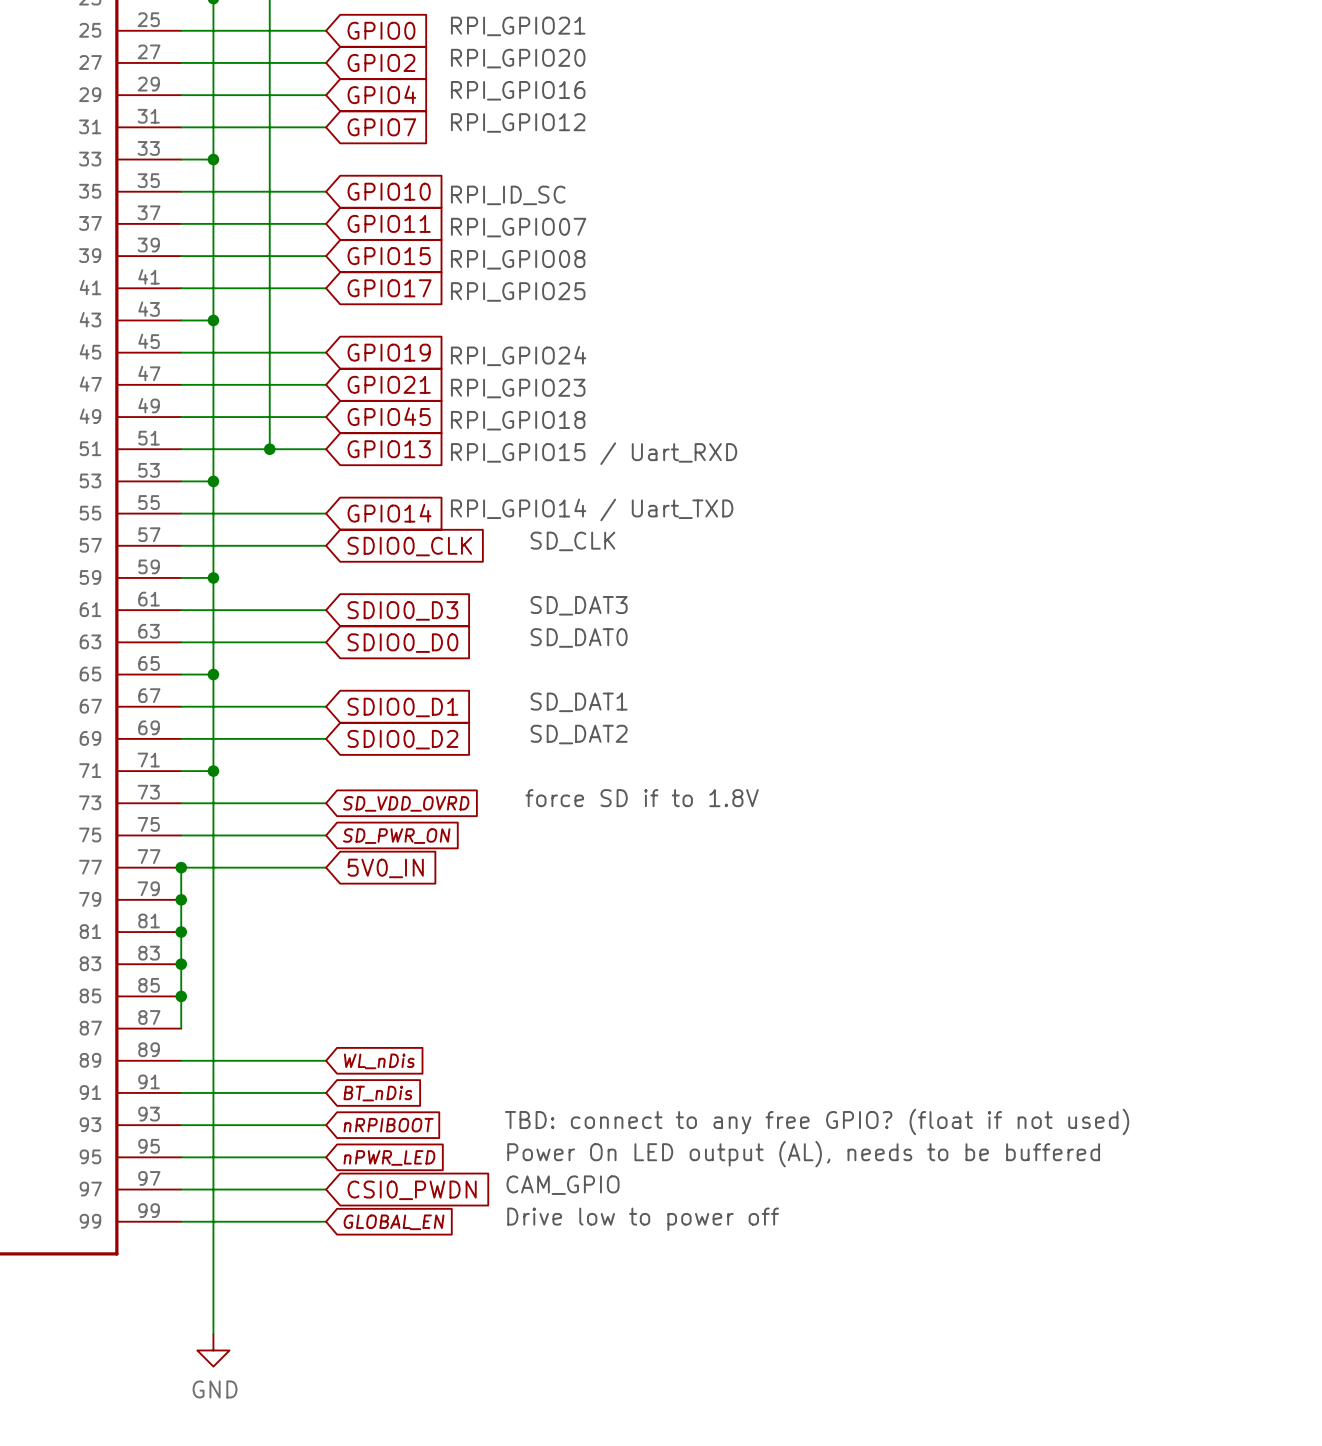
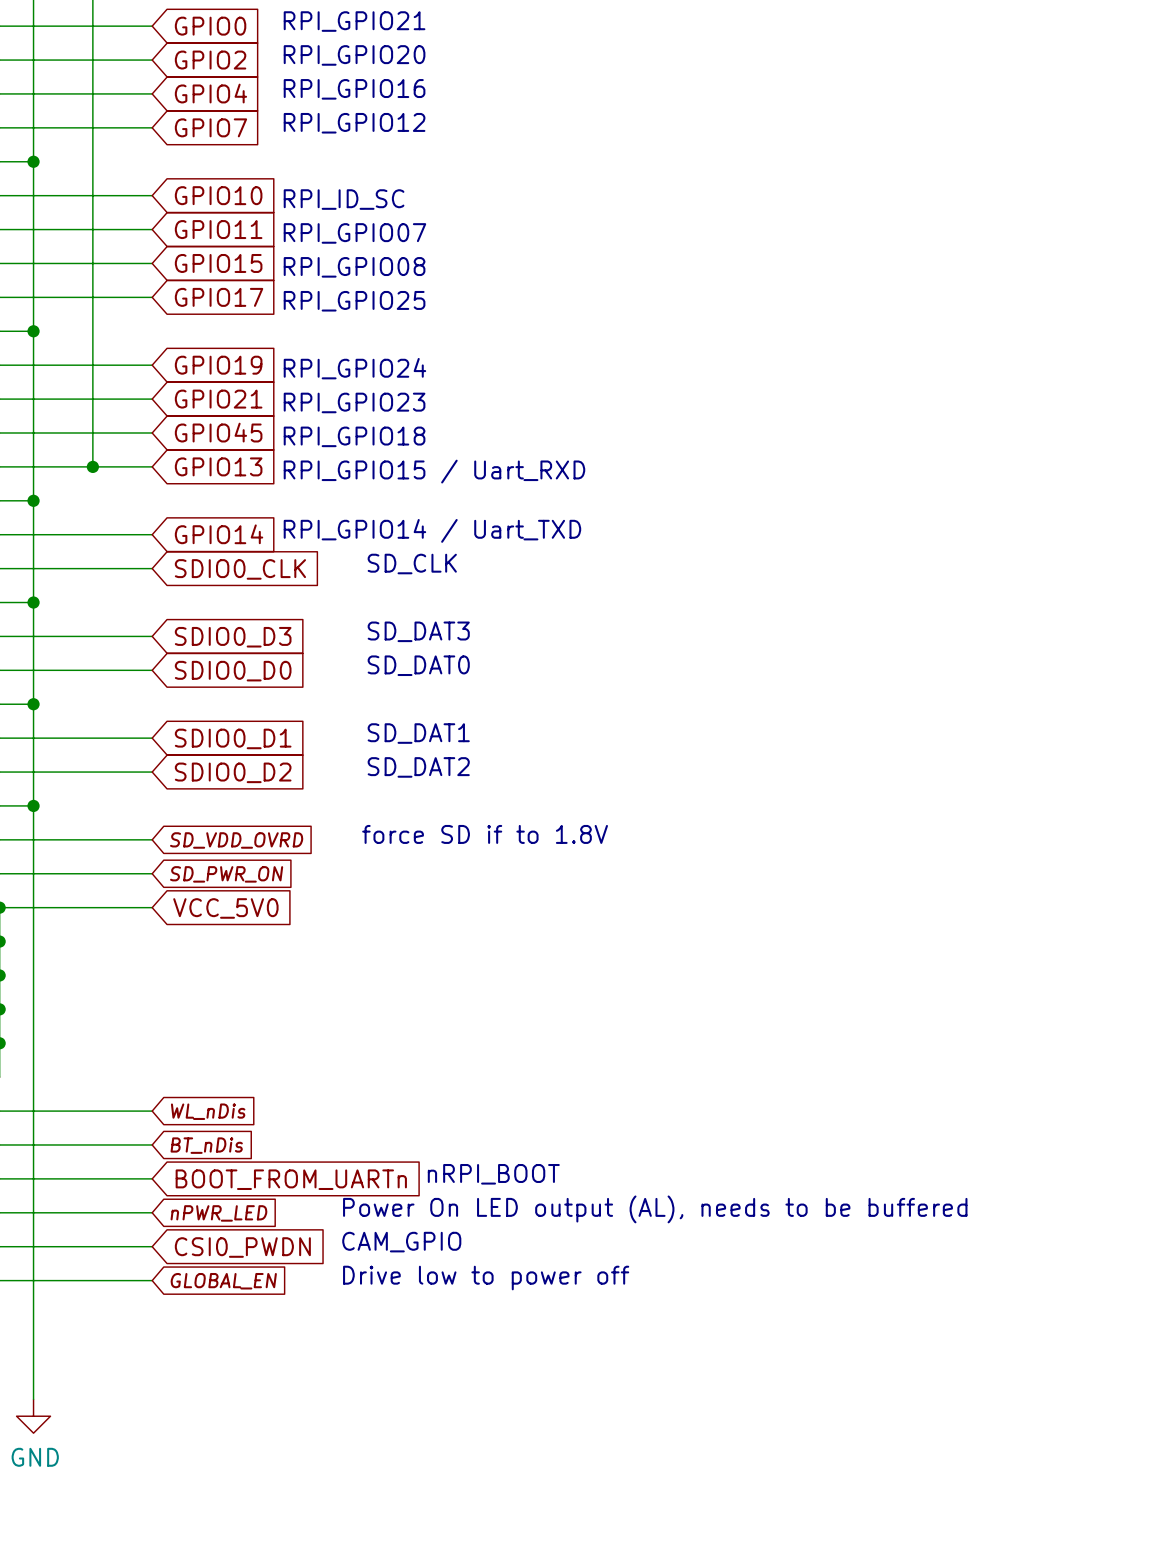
global label: 5V0_IN (385, 868) -> VCC_5V0 (225, 908)
text: none -> nRPI_BOOT (493, 1174)
text: TBD: connect to any free GPIO? (float if not used) (817, 1121) -> none
global label: nRPIBOOT (388, 1125) -> BOOT_FROM_UARTn (291, 1179)

